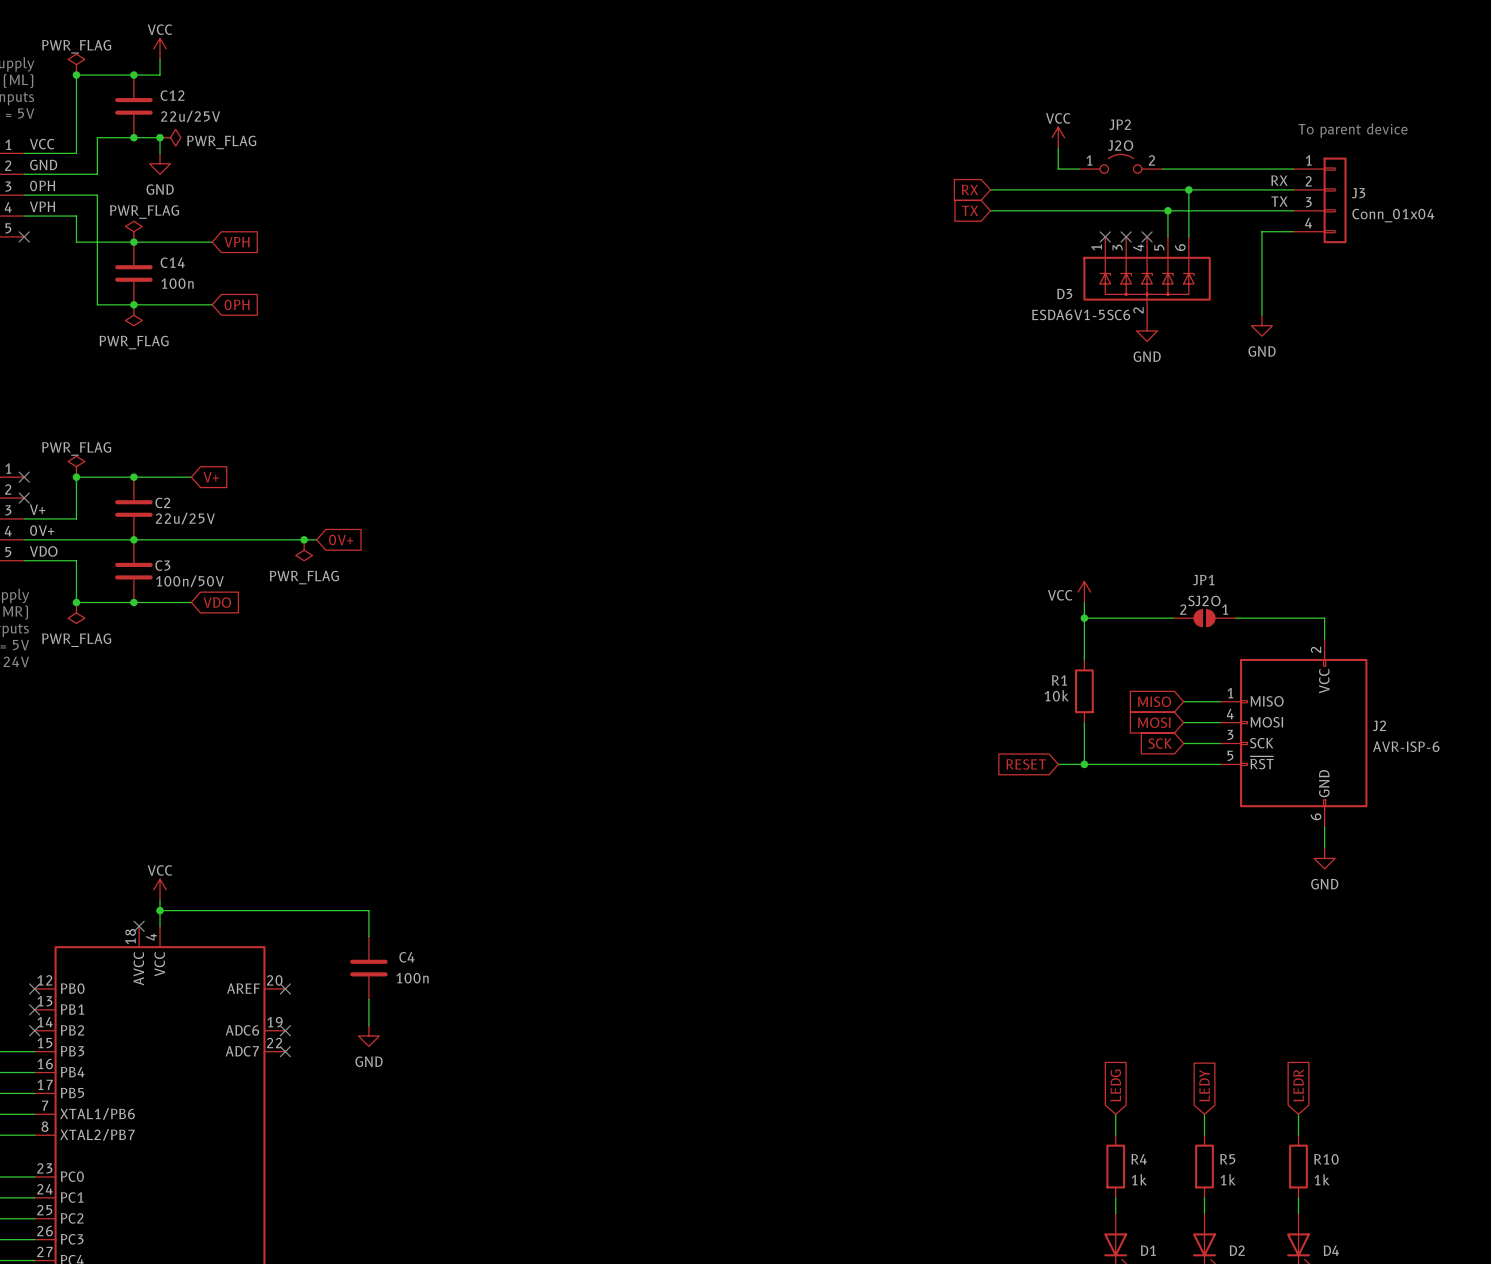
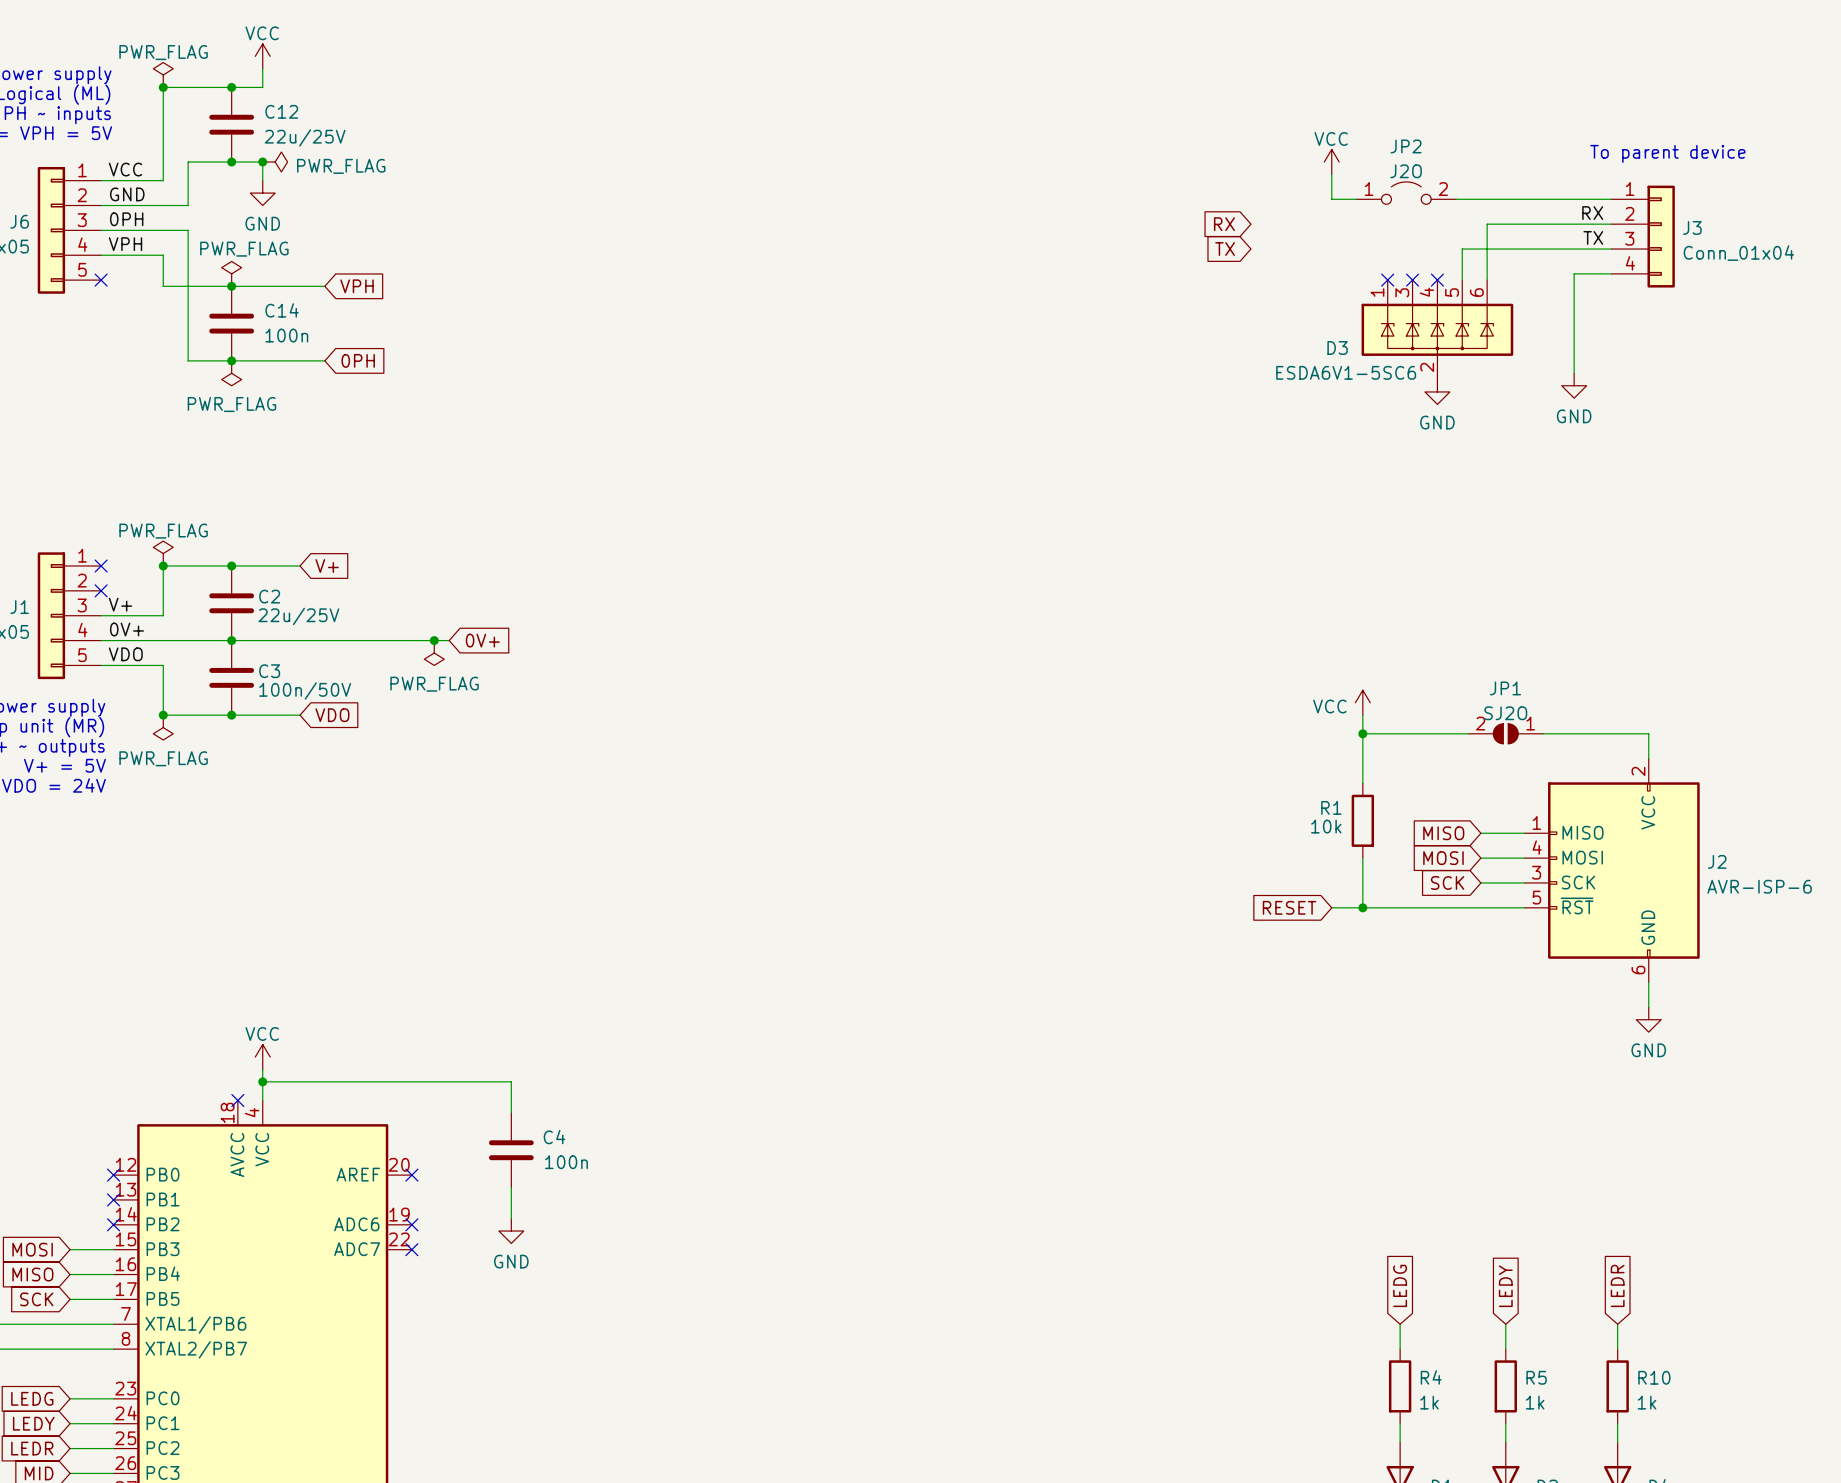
wire: (990, 189) (1188, 189) -> none
junction: (1188, 189) -> none
wire: (990, 210) (1167, 210) -> none
junction: (1167, 210) -> none

